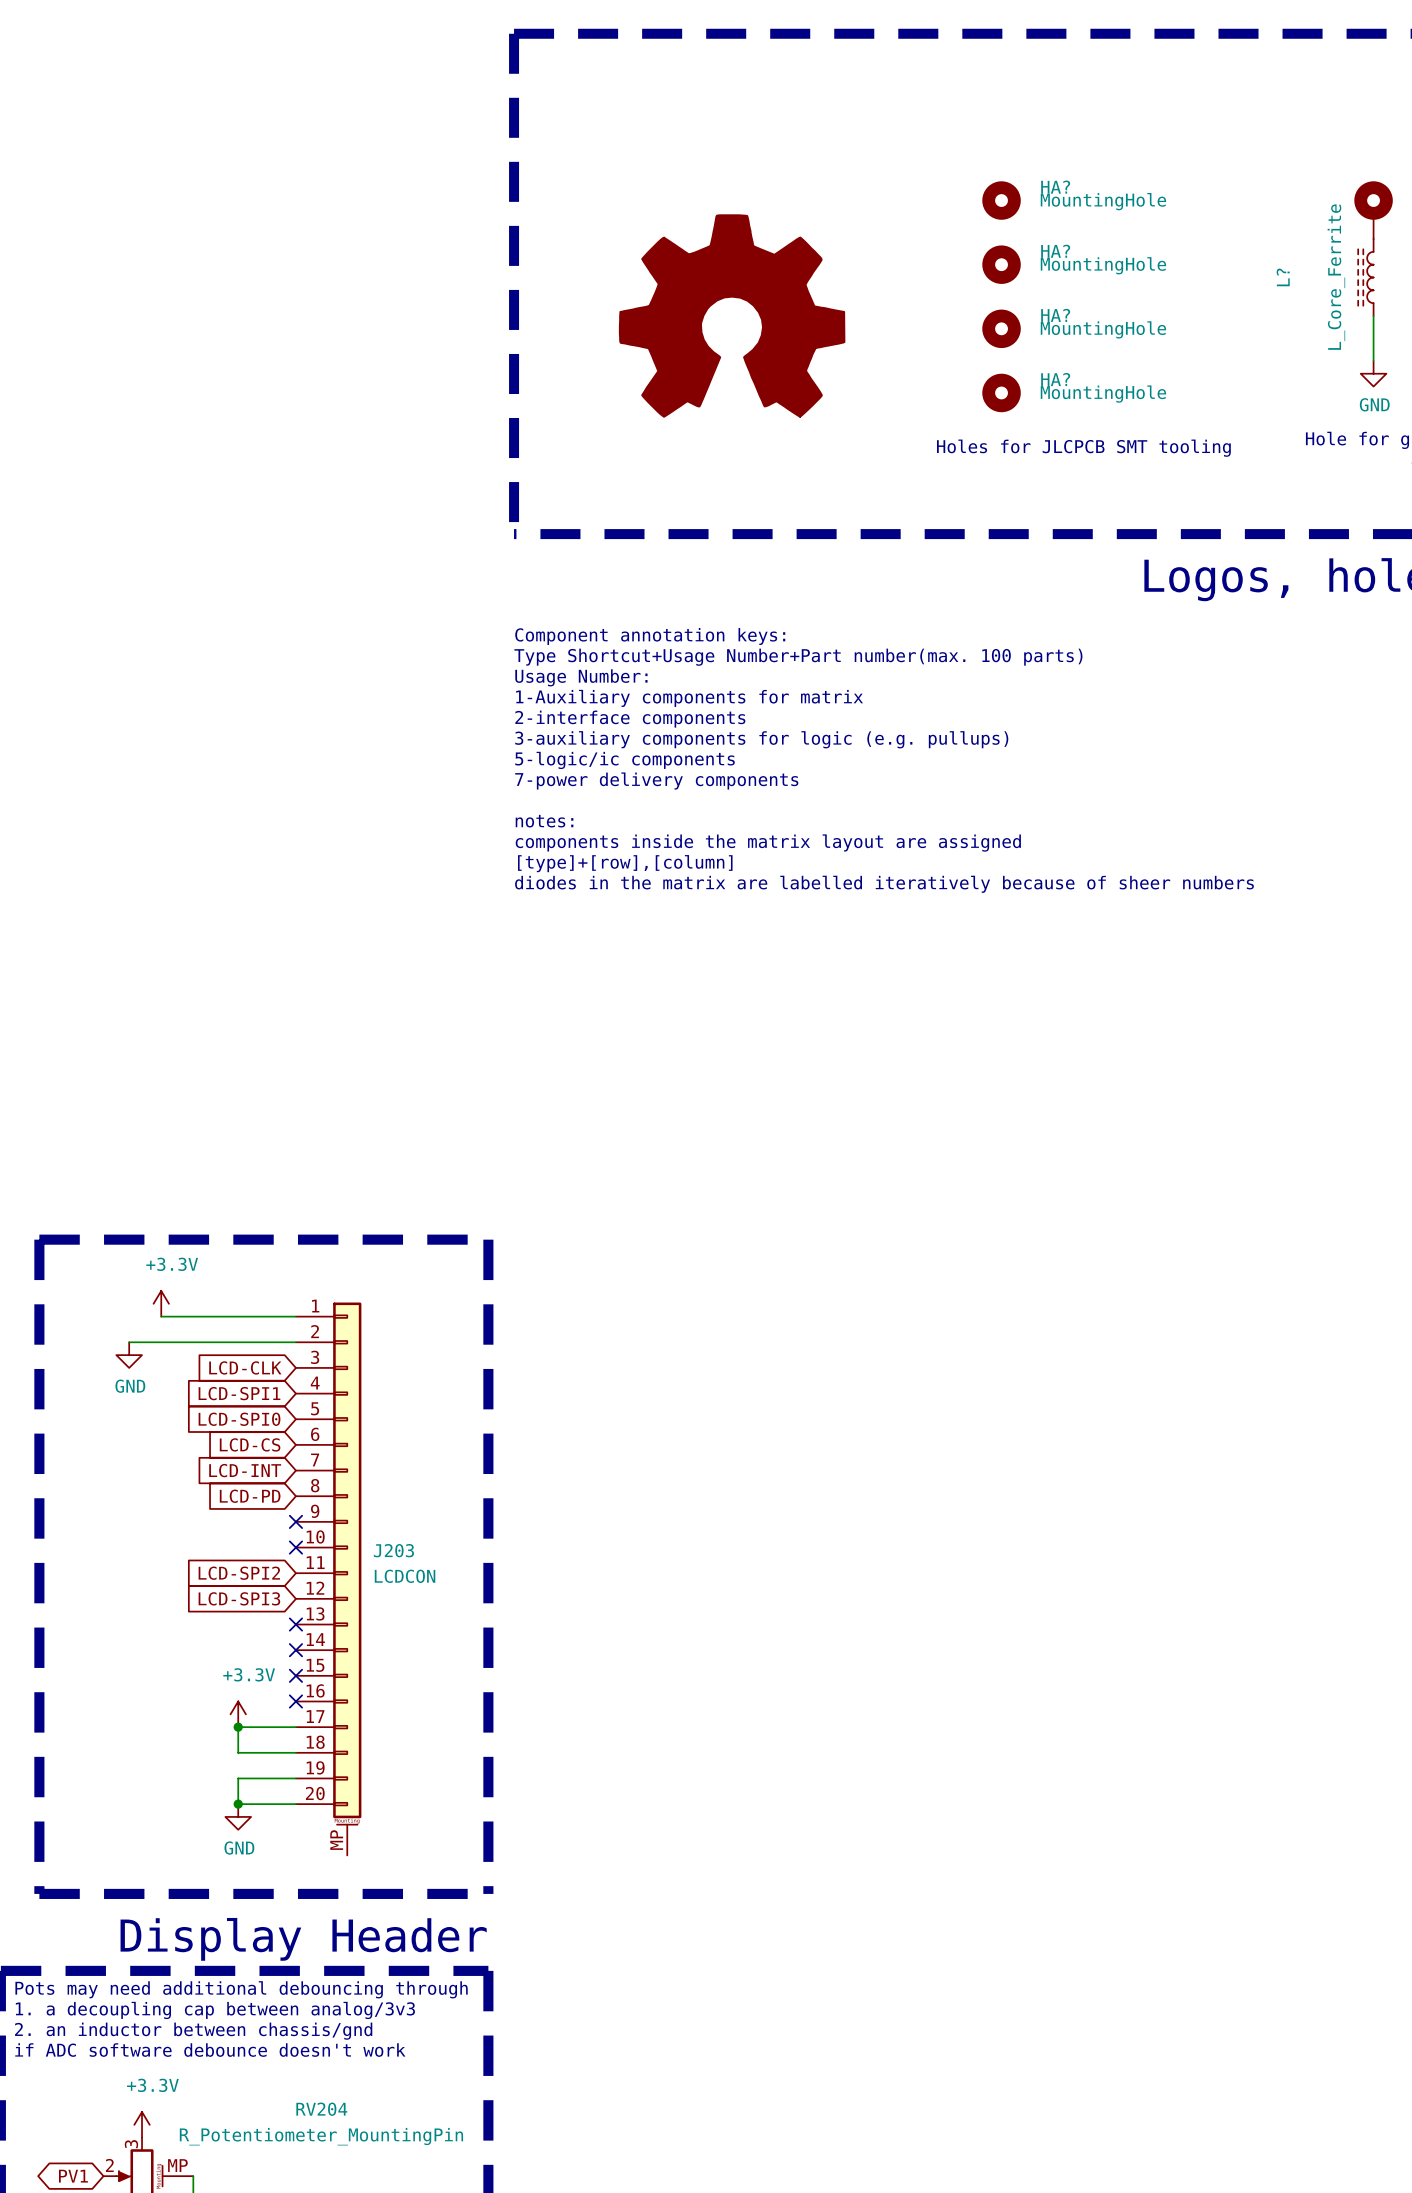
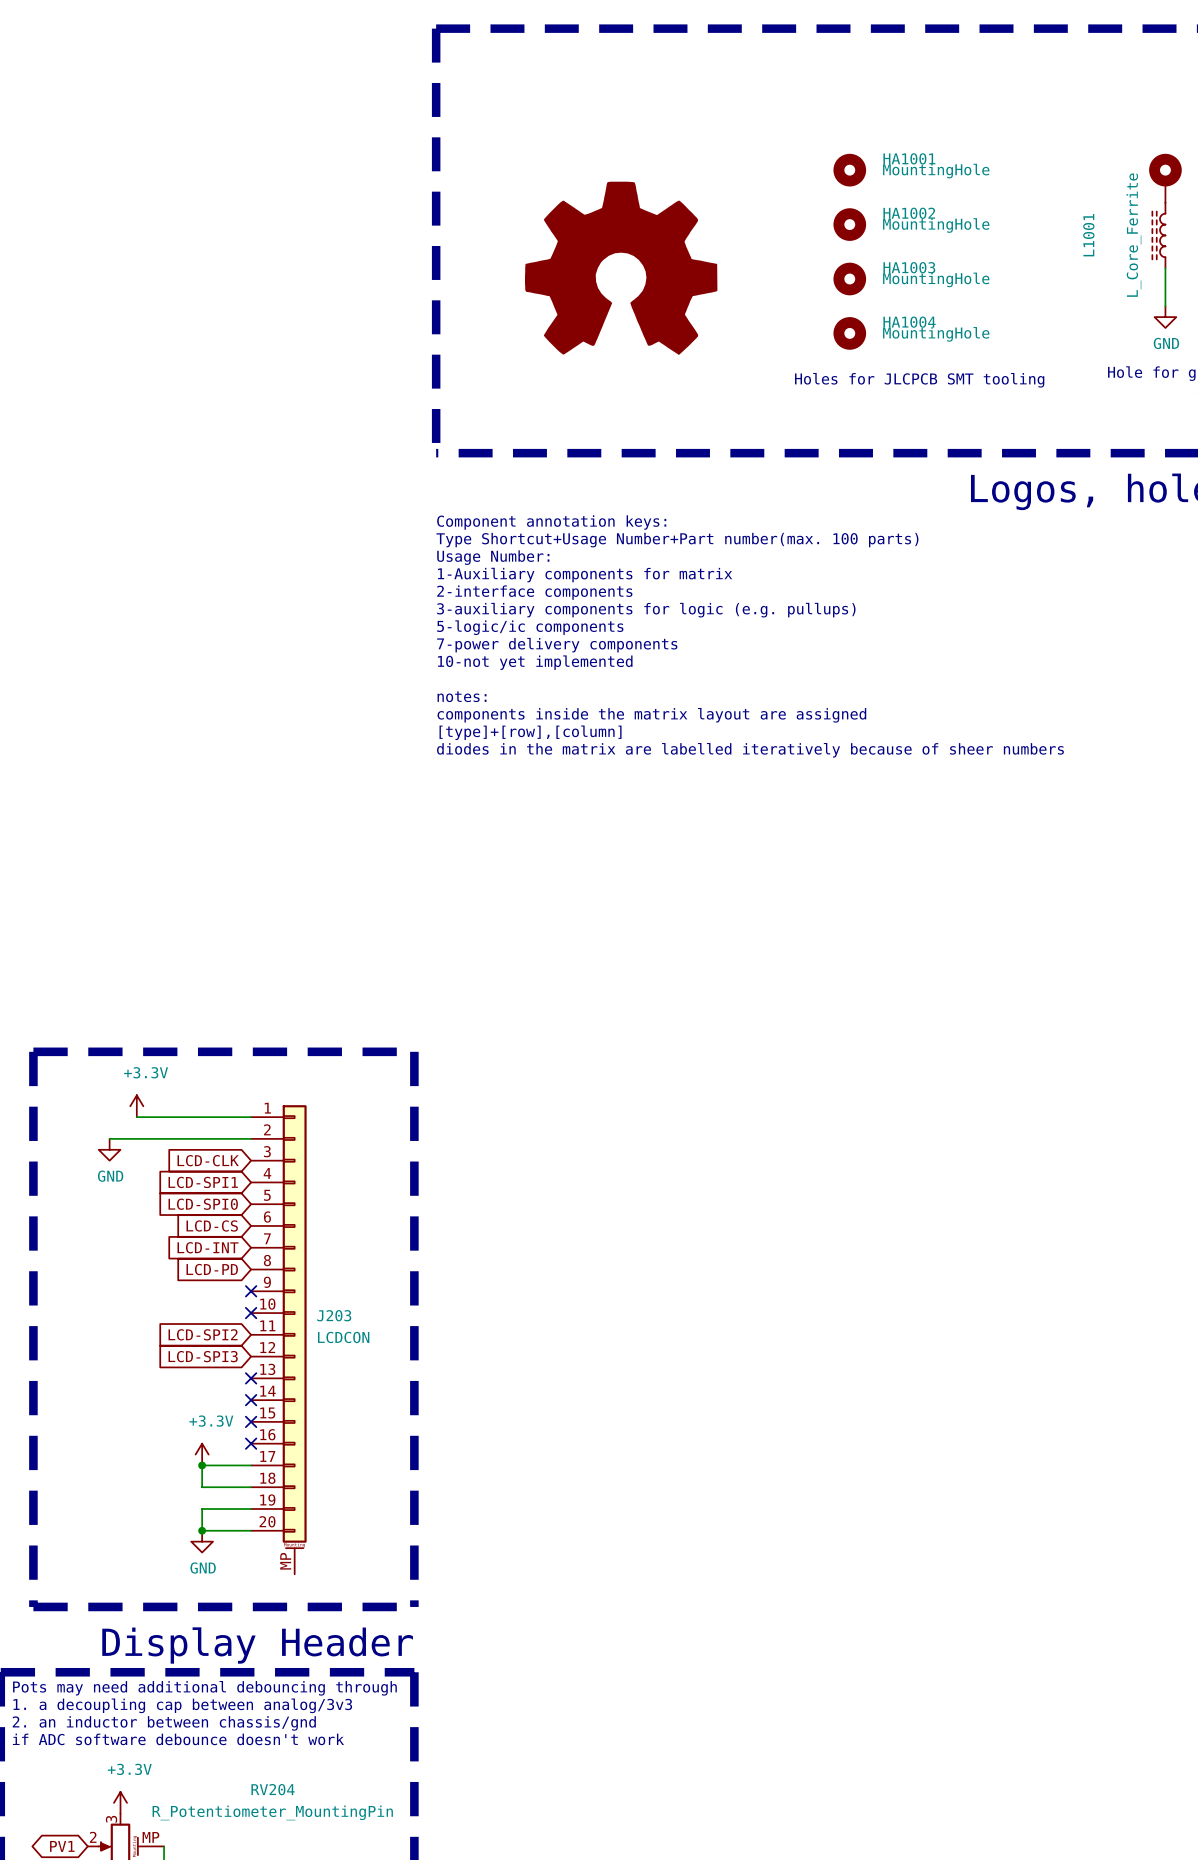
HA? name: HA? (1055, 187) -> HA1001 (909, 158)
HA? name: HA? (1055, 251) -> HA1002 (909, 213)
L? name: L? (1283, 277) -> L1001 (1088, 235)
HA? name: HA? (1055, 315) -> HA1003 (909, 267)
HA? name: HA? (1055, 379) -> HA1004 (909, 322)
text: none -> Component annotation keys: (551, 522)
text: Component annotation keys: (650, 636) -> Type Shortcut+Usage Number+Part number(max. 100 parts) (677, 540)
text: Type Shortcut+Usage Number+Part number(max. 100 parts) (798, 657) -> Usage Number: (493, 557)
text: Usage Number: (581, 677) -> 1-Auxiliary components for matrix (585, 575)
text: 1-Auxiliary components for matrix (689, 698) -> 2-interface components (534, 592)
text: 2-interface components (630, 719) -> 3-auxiliary components for logic (e.g. pullups) (646, 610)
text: 3-auxiliary components for logic (e.g. pullups) (761, 739) -> 5-logic/ic components (530, 627)
text: 5-logic/ic components (625, 760) -> 7-power delivery components (557, 645)
text: 7-power delivery components (656, 781) -> 10-not yet implemented (535, 662)

